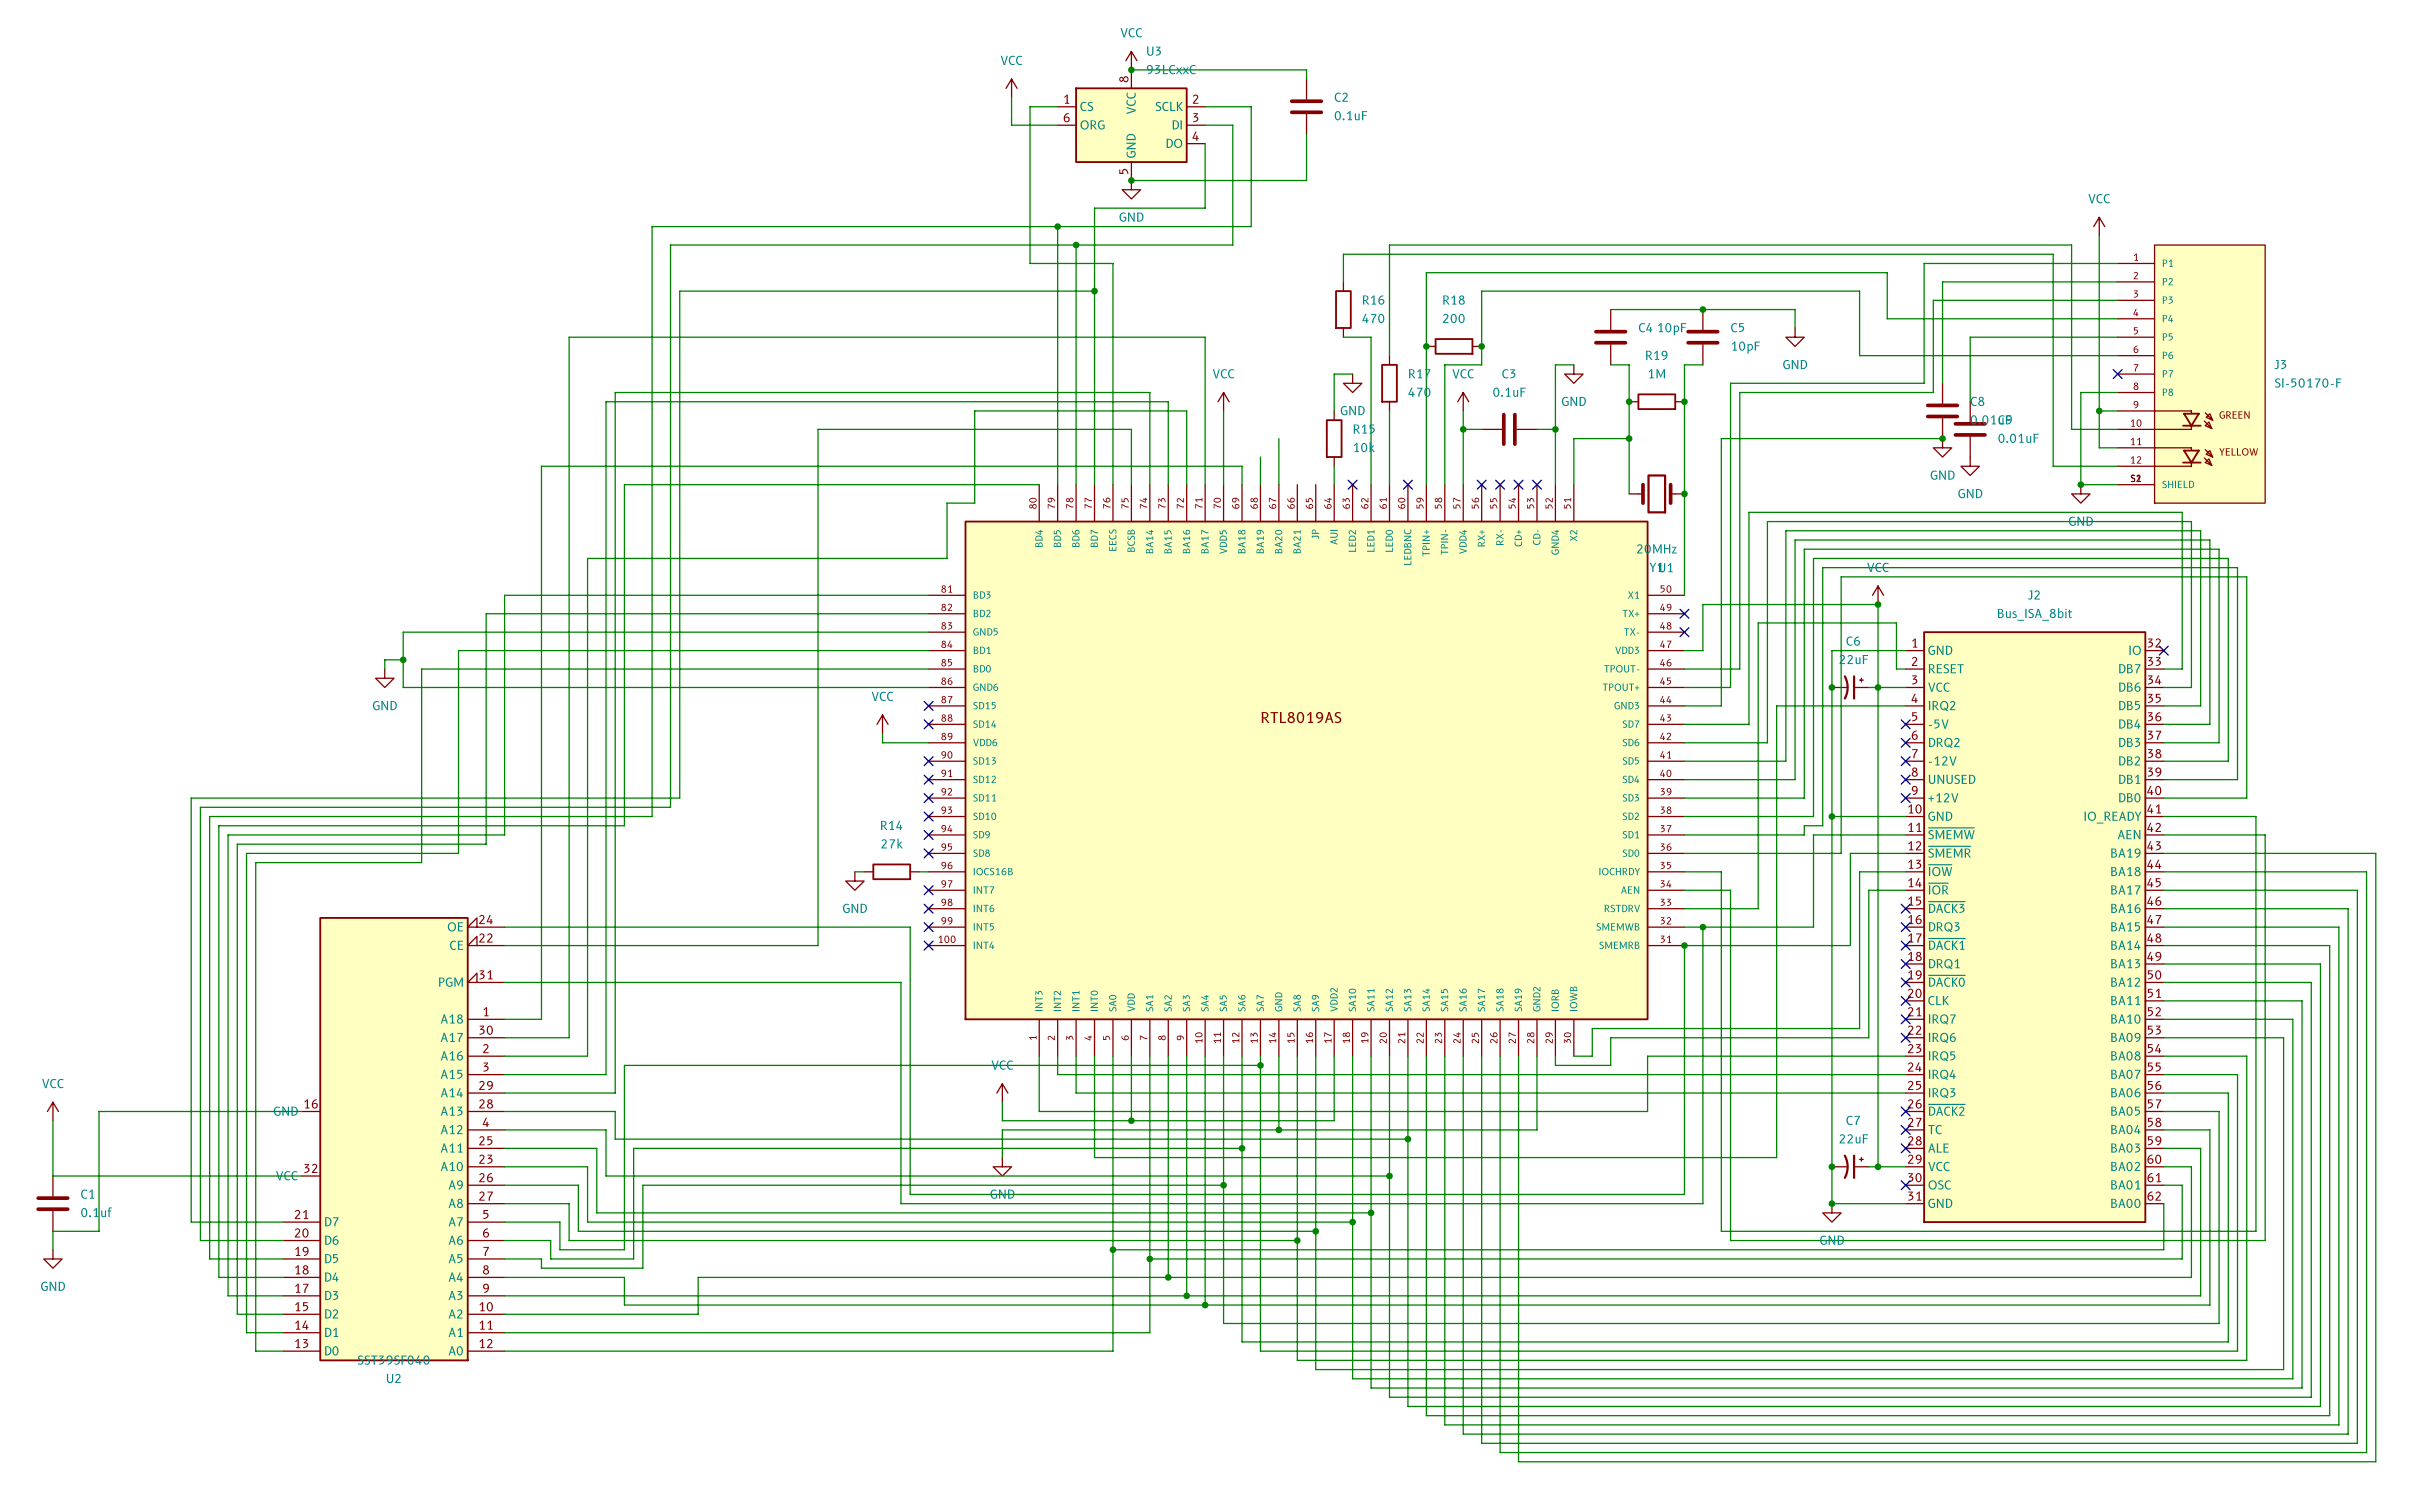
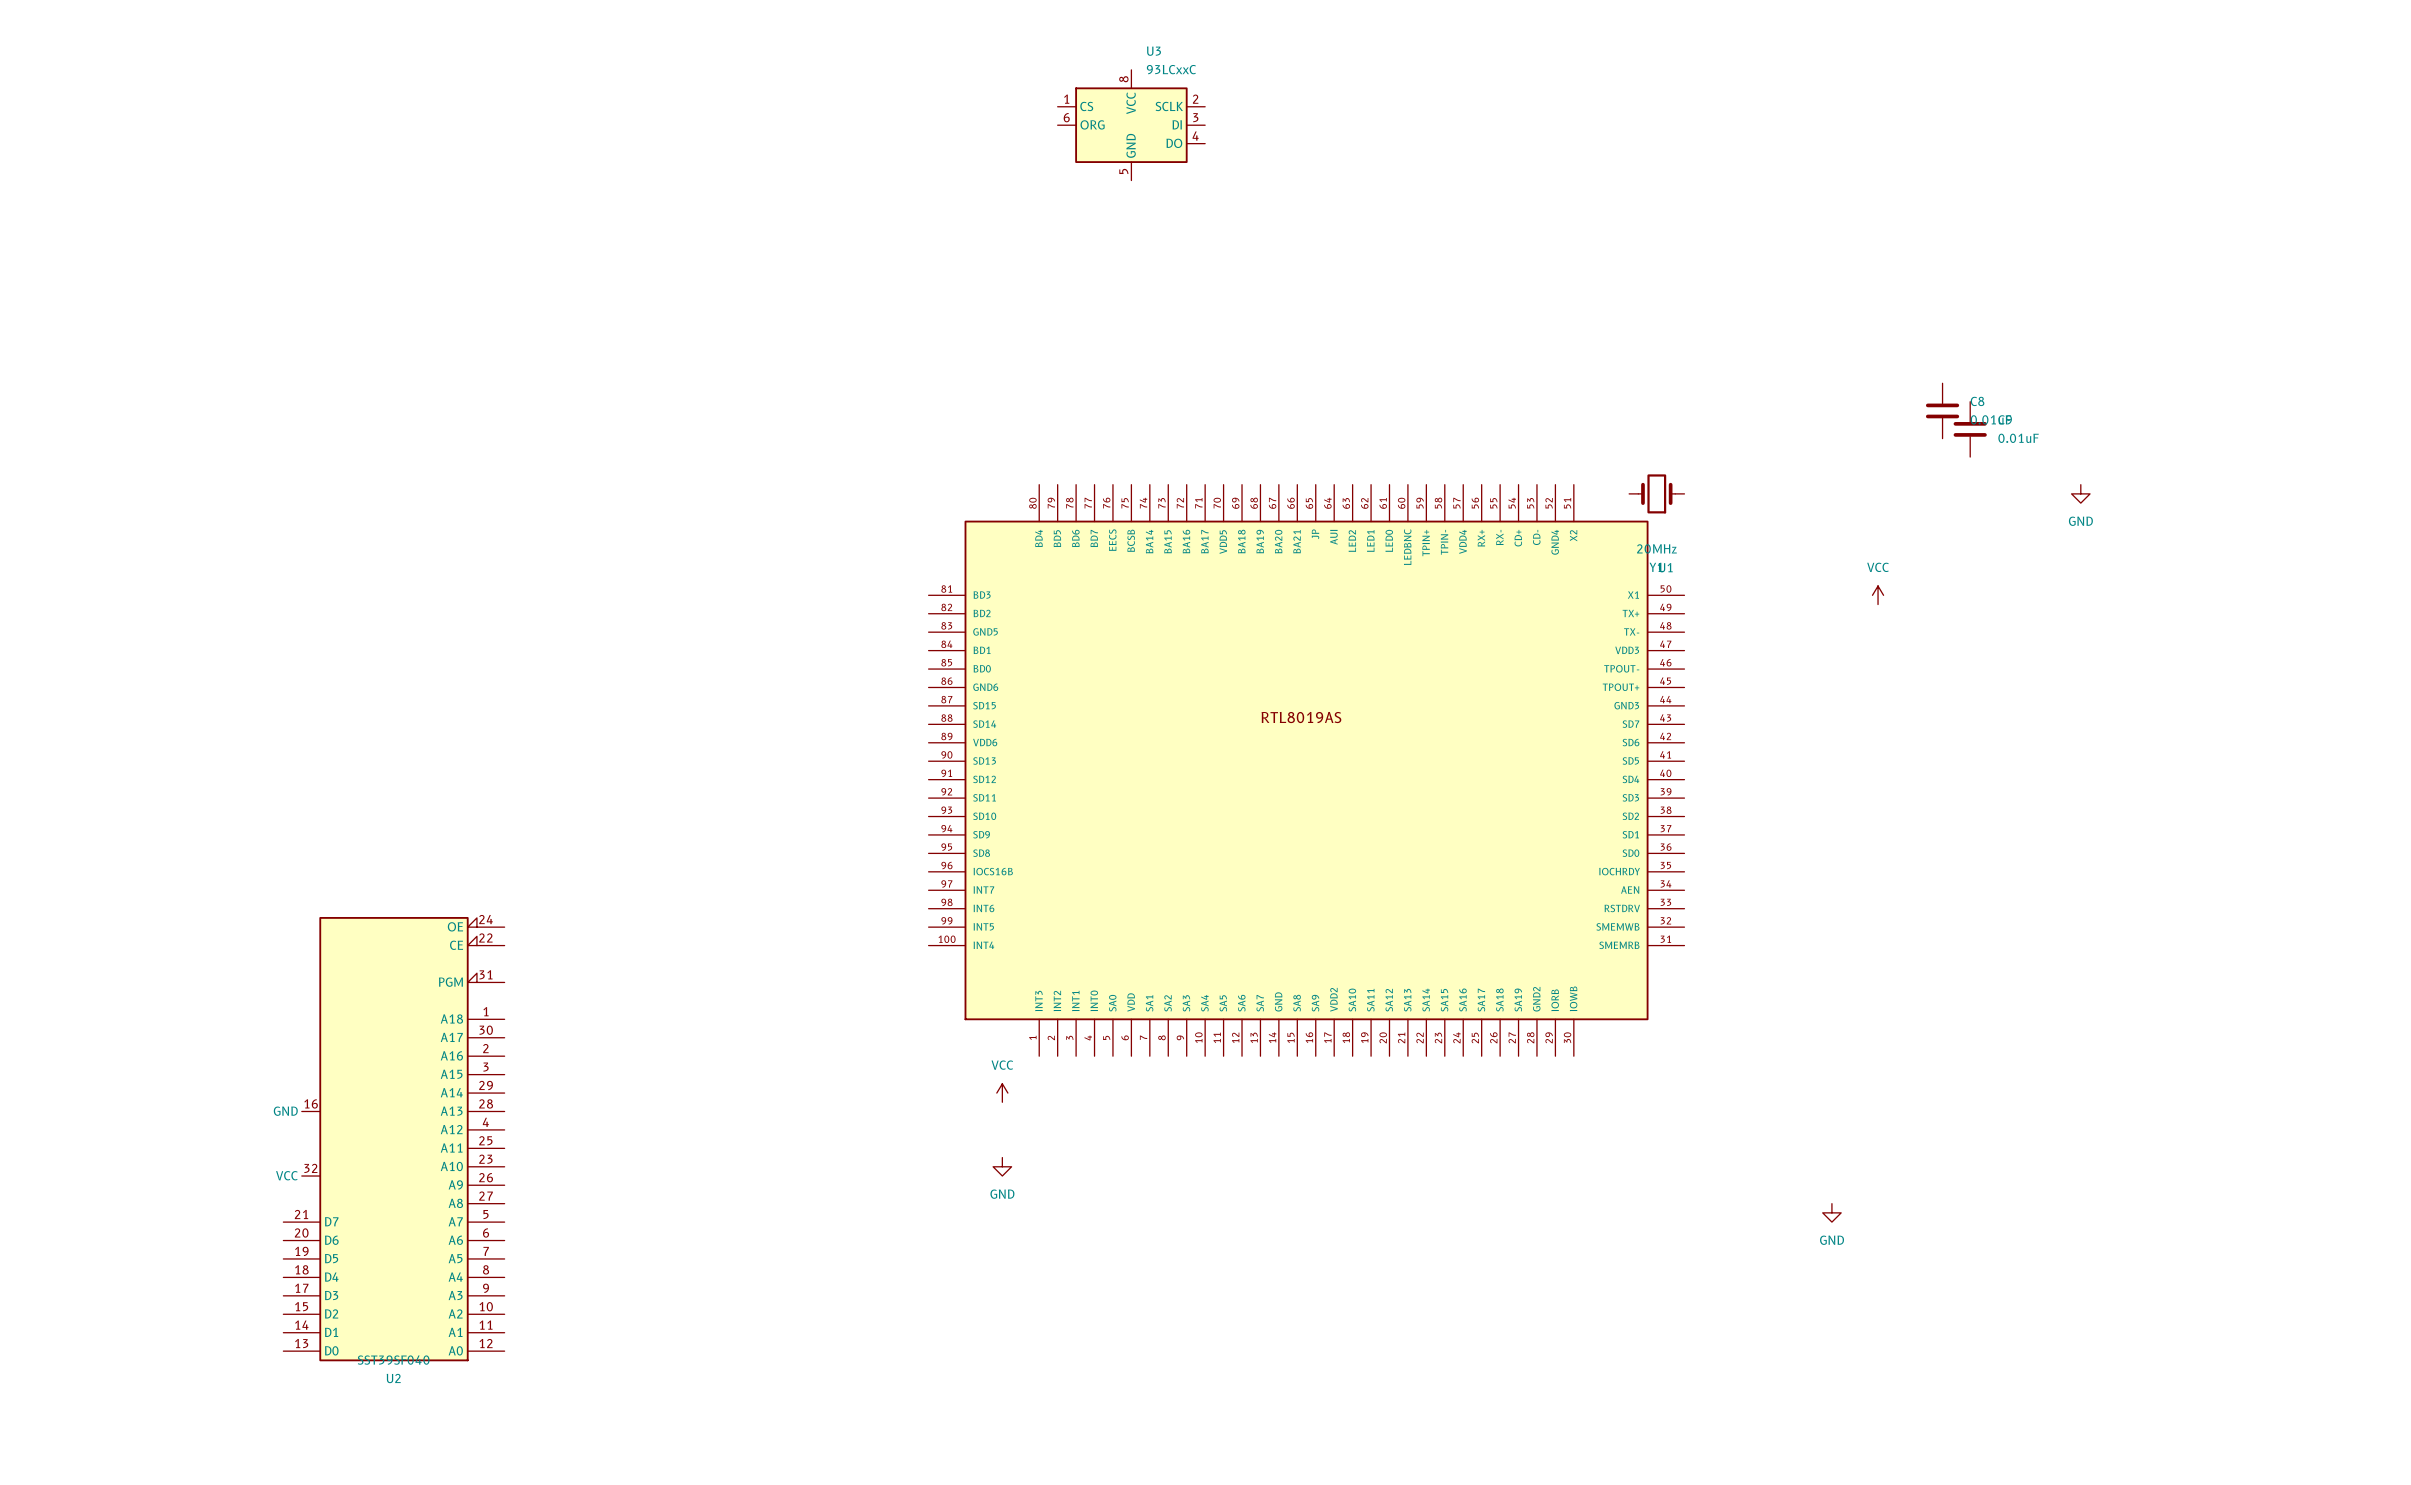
power symbol: VCC (1131, 60) -> none
wire: (1131, 69) (1306, 69) (1306, 79) -> none
junction: (1131, 69) -> none
power symbol: VCC (1011, 88) -> none
wire: (1011, 97) (1011, 125) (1057, 125) -> none
wire: (1057, 106) (1030, 106) (1030, 263) (1112, 263) (1112, 484) -> none
wire: (1205, 106) (1251, 106) (1251, 226) (652, 226) (652, 816) (209, 816) (209, 1258) (283, 1258) -> none
C2: 0.1uF (1306, 106) -> none
wire: (1205, 125) (1232, 125) (1232, 245) (670, 245) (670, 807) (200, 807) (200, 1240) (283, 1240) -> none
wire: (1306, 134) (1306, 180) (1131, 180) -> none
wire: (1205, 143) (1205, 208) (1094, 208) (1094, 484) -> none
junction: (1131, 180) -> none
power symbol: GND (1131, 189) -> none
wire: (1057, 226) (1057, 484) -> none
junction: (1057, 226) -> none
power symbol: VCC (2099, 226) -> none
wire: (2099, 235) (2099, 447) (2117, 447) -> none
wire: (1076, 245) (1076, 484) -> none
junction: (1076, 245) -> none
wire: (2117, 263) (1924, 263) (1924, 383) (1730, 383) (1730, 687) (1684, 687) -> none
wire: (1343, 281) (1343, 254) (2053, 254) (2053, 466) (2117, 466) -> none
wire: (2117, 281) (1942, 281) (1942, 383) -> none
wire: (1094, 291) (679, 291) (679, 798) (191, 798) (191, 1222) (283, 1222) -> none
junction: (1094, 291) -> none
wire: (2117, 300) (1933, 300) (1933, 392) (1739, 392) (1739, 669) (1684, 669) -> none
R16: 470 (1343, 309) -> none
wire: (1610, 309) (1795, 309) (1795, 327) -> none
junction: (1702, 309) -> none
wire: (2117, 318) (1887, 318) (1887, 272) (1426, 272) (1426, 484) -> none
wire: (1343, 337) (1371, 337) (1371, 484) -> none
C4: 10pF (1610, 337) -> none
C5: 10pF (1702, 337) -> none
power symbol: GND (1795, 337) -> none
wire: (2117, 337) (1970, 337) (1970, 401) -> none
junction: (1426, 346) -> none
R18: 200 (1454, 346) -> none
junction: (1481, 346) -> none
wire: (1389, 355) (1389, 245) (2071, 245) (2071, 429) (2117, 429) -> none
wire: (2117, 355) (1859, 355) (1859, 291) (1481, 291) (1481, 364) (1444, 364) (1444, 484) -> none
wire: (1573, 364) (1555, 364) (1555, 484) -> none
wire: (1610, 364) (1629, 364) (1629, 493) -> none
wire: (1702, 364) (1684, 364) (1684, 595) -> none
wire: (1352, 374) (1334, 374) (1334, 410) -> none
power symbol: GND (1573, 374) -> none
no-connect mark: (2117, 374) -> none
J3: SI-50170-F (2191, 374) -> none
power symbol: GND (1352, 383) -> none
R17: 470 (1389, 383) -> none
wire: (2117, 392) (2080, 392) (2080, 484) (2117, 484) -> none
power symbol: VCC (1223, 401) -> none
power symbol: VCC (1463, 401) -> none
junction: (1629, 401) -> none
R19: 1M (1656, 401) -> none
junction: (1684, 401) -> none
wire: (1223, 410) (1223, 484) -> none
wire: (1389, 410) (1389, 484) -> none
wire: (1463, 410) (1463, 484) -> none
wire: (2099, 410) (2117, 410) -> none
junction: (2099, 410) -> none
wire: (1463, 429) (1481, 429) -> none
junction: (1463, 429) -> none
C3: 0.1uF (1509, 429) -> none
wire: (1536, 429) (1555, 429) -> none
junction: (1555, 429) -> none
wire: (1278, 438) (1278, 484) -> none
R15: 10k (1334, 438) -> none
wire: (1629, 438) (1573, 438) (1573, 484) -> none
junction: (1629, 438) -> none
wire: (1942, 438) (1721, 438) (1721, 705) (1684, 705) -> none
junction: (1942, 438) -> none
power symbol: GND (1942, 447) -> none
wire: (1260, 457) (1260, 484) -> none
wire: (1334, 466) (1334, 484) -> none
power symbol: GND (1970, 466) -> none
wire: (1039, 484) (624, 484) (624, 825) (218, 825) (218, 1277) (283, 1277) -> none
wire: (1131, 484) (1131, 429) (818, 429) (818, 945) (504, 945) -> none
wire: (1149, 484) (1149, 392) (615, 392) (615, 1093) (504, 1093) -> none
wire: (1168, 484) (1168, 401) (605, 401) (605, 1074) (504, 1074) -> none
wire: (1186, 484) (1186, 410) (974, 410) (974, 503) (947, 503) (947, 558) (587, 558) (587, 1056) (504, 1056) -> none
wire: (1205, 484) (1205, 337) (569, 337) (569, 1037) (504, 1037) -> none
wire: (1242, 484) (1242, 466) (541, 466) (541, 1019) (504, 1019) -> none
no-connect mark: (1352, 484) -> none
no-connect mark: (1407, 484) -> none
no-connect mark: (1481, 484) -> none
no-connect mark: (1500, 484) -> none
no-connect mark: (1518, 484) -> none
no-connect mark: (1536, 484) -> none
junction: (2080, 484) -> none
junction: (1684, 493) -> none
wire: (928, 595) (504, 595) (504, 834) (228, 834) (228, 1295) (283, 1295) -> none
junction: (1878, 604) -> none
wire: (928, 613) (486, 613) (486, 844) (237, 844) (237, 1314) (283, 1314) -> none
no-connect mark: (1684, 613) -> none
wire: (928, 632) (403, 632) (403, 687) (928, 687) -> none
no-connect mark: (1684, 632) -> none
wire: (928, 650) (458, 650) (458, 853) (246, 853) (246, 1332) (283, 1332) -> none
wire: (1684, 650) (1702, 650) (1702, 604) (1878, 604) (1878, 1166) -> none
wire: (1905, 650) (1831, 650) (1831, 1203) (1905, 1203) -> none
no-connect mark: (2163, 650) -> none
wire: (403, 659) (384, 659) (384, 669) -> none
junction: (403, 659) -> none
wire: (928, 669) (421, 669) (421, 862) (255, 862) (255, 1351) (283, 1351) -> none
wire: (1905, 669) (1896, 669) (1896, 622) (1758, 622) (1758, 908) (1684, 908) -> none
wire: (2163, 669) (2182, 669) (2182, 512) (1748, 512) (1748, 724) (1684, 724) -> none
power symbol: GND (384, 678) -> none
junction: (1831, 687) -> none
C6: 22uF (1850, 687) -> none
wire: (1868, 687) (1905, 687) -> none
junction: (1878, 687) -> none
wire: (2163, 687) (2191, 687) (2191, 521) (1767, 521) (1767, 742) (1684, 742) -> none
no-connect mark: (928, 705) -> none
wire: (1905, 705) (1776, 705) (1776, 1157) (1094, 1157) (1094, 1056) -> none
wire: (2163, 705) (2200, 705) (2200, 530) (1785, 530) (1785, 761) (1684, 761) -> none
power symbol: VCC (882, 724) -> none
no-connect mark: (928, 724) -> none
no-connect mark: (1905, 724) -> none
wire: (2163, 724) (2209, 724) (2209, 539) (1795, 539) (1795, 779) (1684, 779) -> none
wire: (882, 733) (882, 742) (928, 742) -> none
no-connect mark: (1905, 742) -> none
wire: (2163, 742) (2219, 742) (2219, 549) (1804, 549) (1804, 798) (1684, 798) -> none
no-connect mark: (928, 761) -> none
no-connect mark: (1905, 761) -> none
wire: (2163, 761) (2228, 761) (2228, 558) (1813, 558) (1813, 816) (1684, 816) -> none
no-connect mark: (928, 779) -> none
no-connect mark: (1905, 779) -> none
wire: (2163, 779) (2237, 779) (2237, 567) (1822, 567) (1822, 825) (1804, 825) (1804, 834) (1684, 834) -> none
no-connect mark: (928, 798) -> none
no-connect mark: (1905, 798) -> none
wire: (2163, 798) (2246, 798) (2246, 576) (1841, 576) (1841, 853) (1684, 853) -> none
no-connect mark: (928, 816) -> none
wire: (1831, 816) (1905, 816) -> none
junction: (1831, 816) -> none
wire: (2163, 816) (2255, 816) (2255, 1231) (1721, 1231) (1721, 871) (1684, 871) -> none
no-connect mark: (928, 834) -> none
wire: (1905, 834) (1813, 834) (1813, 927) (1684, 927) -> none
wire: (2163, 834) (2265, 834) (2265, 1240) (1730, 1240) (1730, 890) (1684, 890) -> none
no-connect mark: (928, 853) -> none
wire: (1905, 853) (1850, 853) (1850, 945) (1684, 945) (1684, 1194) (910, 1194) (910, 927) (504, 927) -> none
wire: (2163, 853) (2375, 853) (2375, 1461) (1518, 1461) (1518, 1056) -> none
wire: (854, 871) (864, 871) -> none
R14: 27k (891, 871) -> none
wire: (919, 871) (928, 871) -> none
wire: (1905, 871) (1859, 871) (1859, 1028) (1592, 1028) (1592, 1056) (1573, 1056) -> none
wire: (2163, 871) (2366, 871) (2366, 1452) (1500, 1452) (1500, 1056) -> none
power symbol: GND (854, 881) -> none
no-connect mark: (928, 890) -> none
wire: (1905, 890) (1868, 890) (1868, 1037) (1610, 1037) (1610, 1065) (1555, 1065) (1555, 1056) -> none
wire: (2163, 890) (2357, 890) (2357, 1443) (1481, 1443) (1481, 1056) -> none
no-connect mark: (928, 908) -> none
no-connect mark: (1905, 908) -> none
wire: (2163, 908) (2348, 908) (2348, 1434) (1463, 1434) (1463, 1056) -> none
no-connect mark: (928, 927) -> none
wire: (1702, 927) (1702, 1203) (900, 1203) (900, 982) (504, 982) -> none
junction: (1702, 927) -> none
no-connect mark: (1905, 927) -> none
J2: Bus_ISA_8bit (2034, 927) -> none
wire: (2163, 927) (2338, 927) (2338, 1424) (1444, 1424) (1444, 1056) -> none
no-connect mark: (928, 945) -> none
junction: (1684, 945) -> none
no-connect mark: (1905, 945) -> none
wire: (2163, 945) (2329, 945) (2329, 1415) (1426, 1415) (1426, 1056) -> none
no-connect mark: (1905, 964) -> none
wire: (2163, 964) (2320, 964) (2320, 1406) (1407, 1406) (1407, 1056) -> none
no-connect mark: (1905, 982) -> none
wire: (2163, 982) (2311, 982) (2311, 1397) (1389, 1397) (1389, 1056) -> none
no-connect mark: (1905, 1000) -> none
wire: (2163, 1000) (2302, 1000) (2302, 1388) (1371, 1388) (1371, 1056) -> none
no-connect mark: (1905, 1019) -> none
wire: (2163, 1019) (2292, 1019) (2292, 1378) (1352, 1378) (1352, 1056) -> none
no-connect mark: (1905, 1037) -> none
wire: (2163, 1037) (2283, 1037) (2283, 1369) (1315, 1369) (1315, 1056) -> none
wire: (1039, 1056) (1039, 1111) (1647, 1111) (1647, 1056) (1905, 1056) -> none
wire: (1057, 1056) (1057, 1074) (1905, 1074) -> none
wire: (1076, 1056) (1076, 1093) (1905, 1093) -> none
wire: (1112, 1056) (1112, 1351) (504, 1351) -> none
wire: (1131, 1056) (1131, 1120) -> none
wire: (1149, 1056) (1149, 1332) (504, 1332) -> none
wire: (1168, 1056) (1168, 1277) -> none
wire: (1186, 1056) (1186, 1295) -> none
wire: (1205, 1056) (1205, 1305) -> none
wire: (1223, 1056) (1223, 1323) (2219, 1323) (2219, 1111) (2163, 1111) -> none
wire: (1242, 1056) (1242, 1341) (2228, 1341) (2228, 1093) (2163, 1093) -> none
wire: (1260, 1056) (1260, 1351) (2237, 1351) (2237, 1074) (2163, 1074) -> none
wire: (1278, 1056) (1278, 1129) -> none
wire: (1297, 1056) (1297, 1360) (2246, 1360) (2246, 1056) (2163, 1056) -> none
wire: (1334, 1056) (1334, 1120) (1002, 1120) (1002, 1102) -> none
wire: (1536, 1056) (1536, 1129) (1002, 1129) (1002, 1157) -> none
wire: (1260, 1065) (624, 1065) (624, 1249) (559, 1249) (559, 1222) (504, 1222) -> none
junction: (1260, 1065) -> none
power symbol: VCC (52, 1111) -> none
wire: (301, 1111) (99, 1111) (99, 1231) (52, 1231) (52, 1249) -> none
wire: (504, 1111) (615, 1111) (615, 1139) (1407, 1139) -> none
no-connect mark: (1905, 1111) -> none
wire: (52, 1120) (52, 1176) (301, 1176) -> none
junction: (1131, 1120) -> none
wire: (504, 1129) (605, 1129) (605, 1176) (1389, 1176) -> none
junction: (1278, 1129) -> none
no-connect mark: (1905, 1129) -> none
wire: (2163, 1129) (2209, 1129) (2209, 1305) (624, 1305) (624, 1277) (504, 1277) -> none
junction: (1407, 1139) -> none
wire: (504, 1148) (596, 1148) (596, 1212) (1371, 1212) -> none
wire: (1242, 1148) (633, 1148) (633, 1258) (550, 1258) (550, 1240) (504, 1240) -> none
junction: (1242, 1148) -> none
no-connect mark: (1905, 1148) -> none
wire: (2163, 1148) (2200, 1148) (2200, 1295) (504, 1295) -> none
wire: (504, 1166) (587, 1166) (587, 1222) (1352, 1222) -> none
junction: (1831, 1166) -> none
C7: 22uF (1850, 1166) -> none
wire: (1868, 1166) (1905, 1166) -> none
junction: (1878, 1166) -> none
wire: (2163, 1166) (2191, 1166) (2191, 1277) (698, 1277) (698, 1314) (504, 1314) -> none
junction: (1389, 1176) -> none
wire: (504, 1185) (578, 1185) (578, 1231) (1315, 1231) -> none
wire: (1223, 1185) (642, 1185) (642, 1268) (541, 1268) (541, 1258) (504, 1258) -> none
junction: (1223, 1185) -> none
no-connect mark: (1905, 1185) -> none
wire: (2163, 1185) (2182, 1185) (2182, 1258) (1149, 1258) -> none
C1: 0.1uf (52, 1203) -> none
wire: (504, 1203) (569, 1203) (569, 1240) (1297, 1240) -> none
junction: (1831, 1203) -> none
wire: (2163, 1203) (2163, 1249) (1112, 1249) -> none
junction: (1371, 1212) -> none
junction: (1352, 1222) -> none
junction: (1315, 1231) -> none
junction: (1297, 1240) -> none
junction: (1112, 1249) -> none
power symbol: GND (52, 1258) -> none
junction: (1149, 1258) -> none
junction: (1168, 1277) -> none
junction: (1186, 1295) -> none
junction: (1205, 1305) -> none

